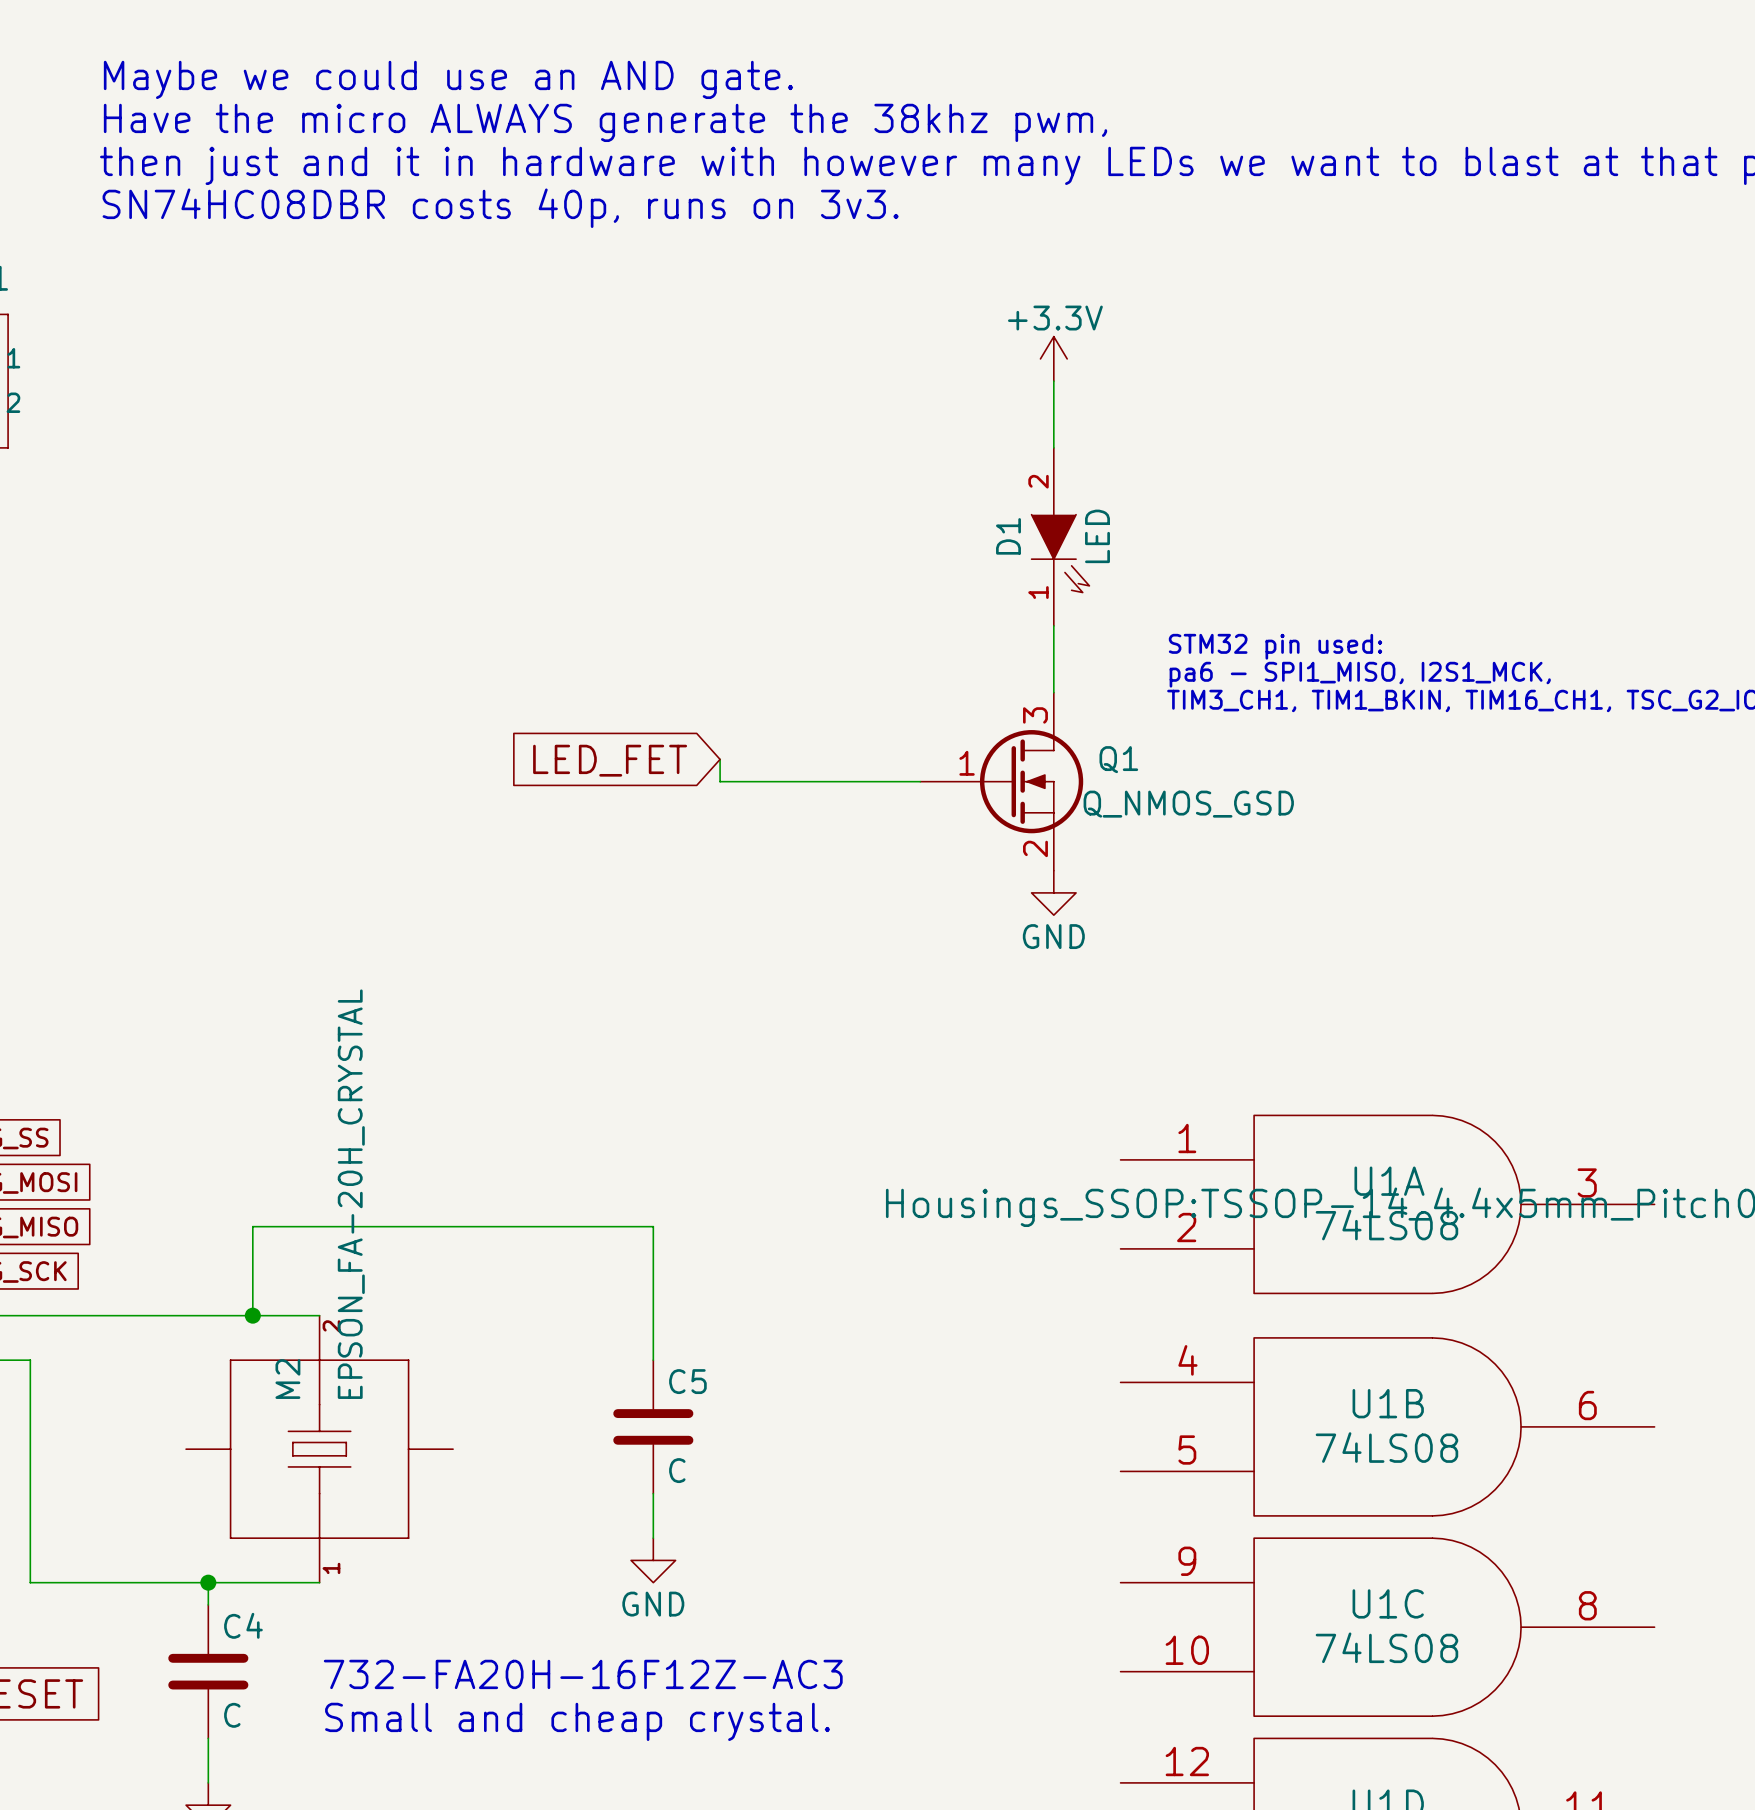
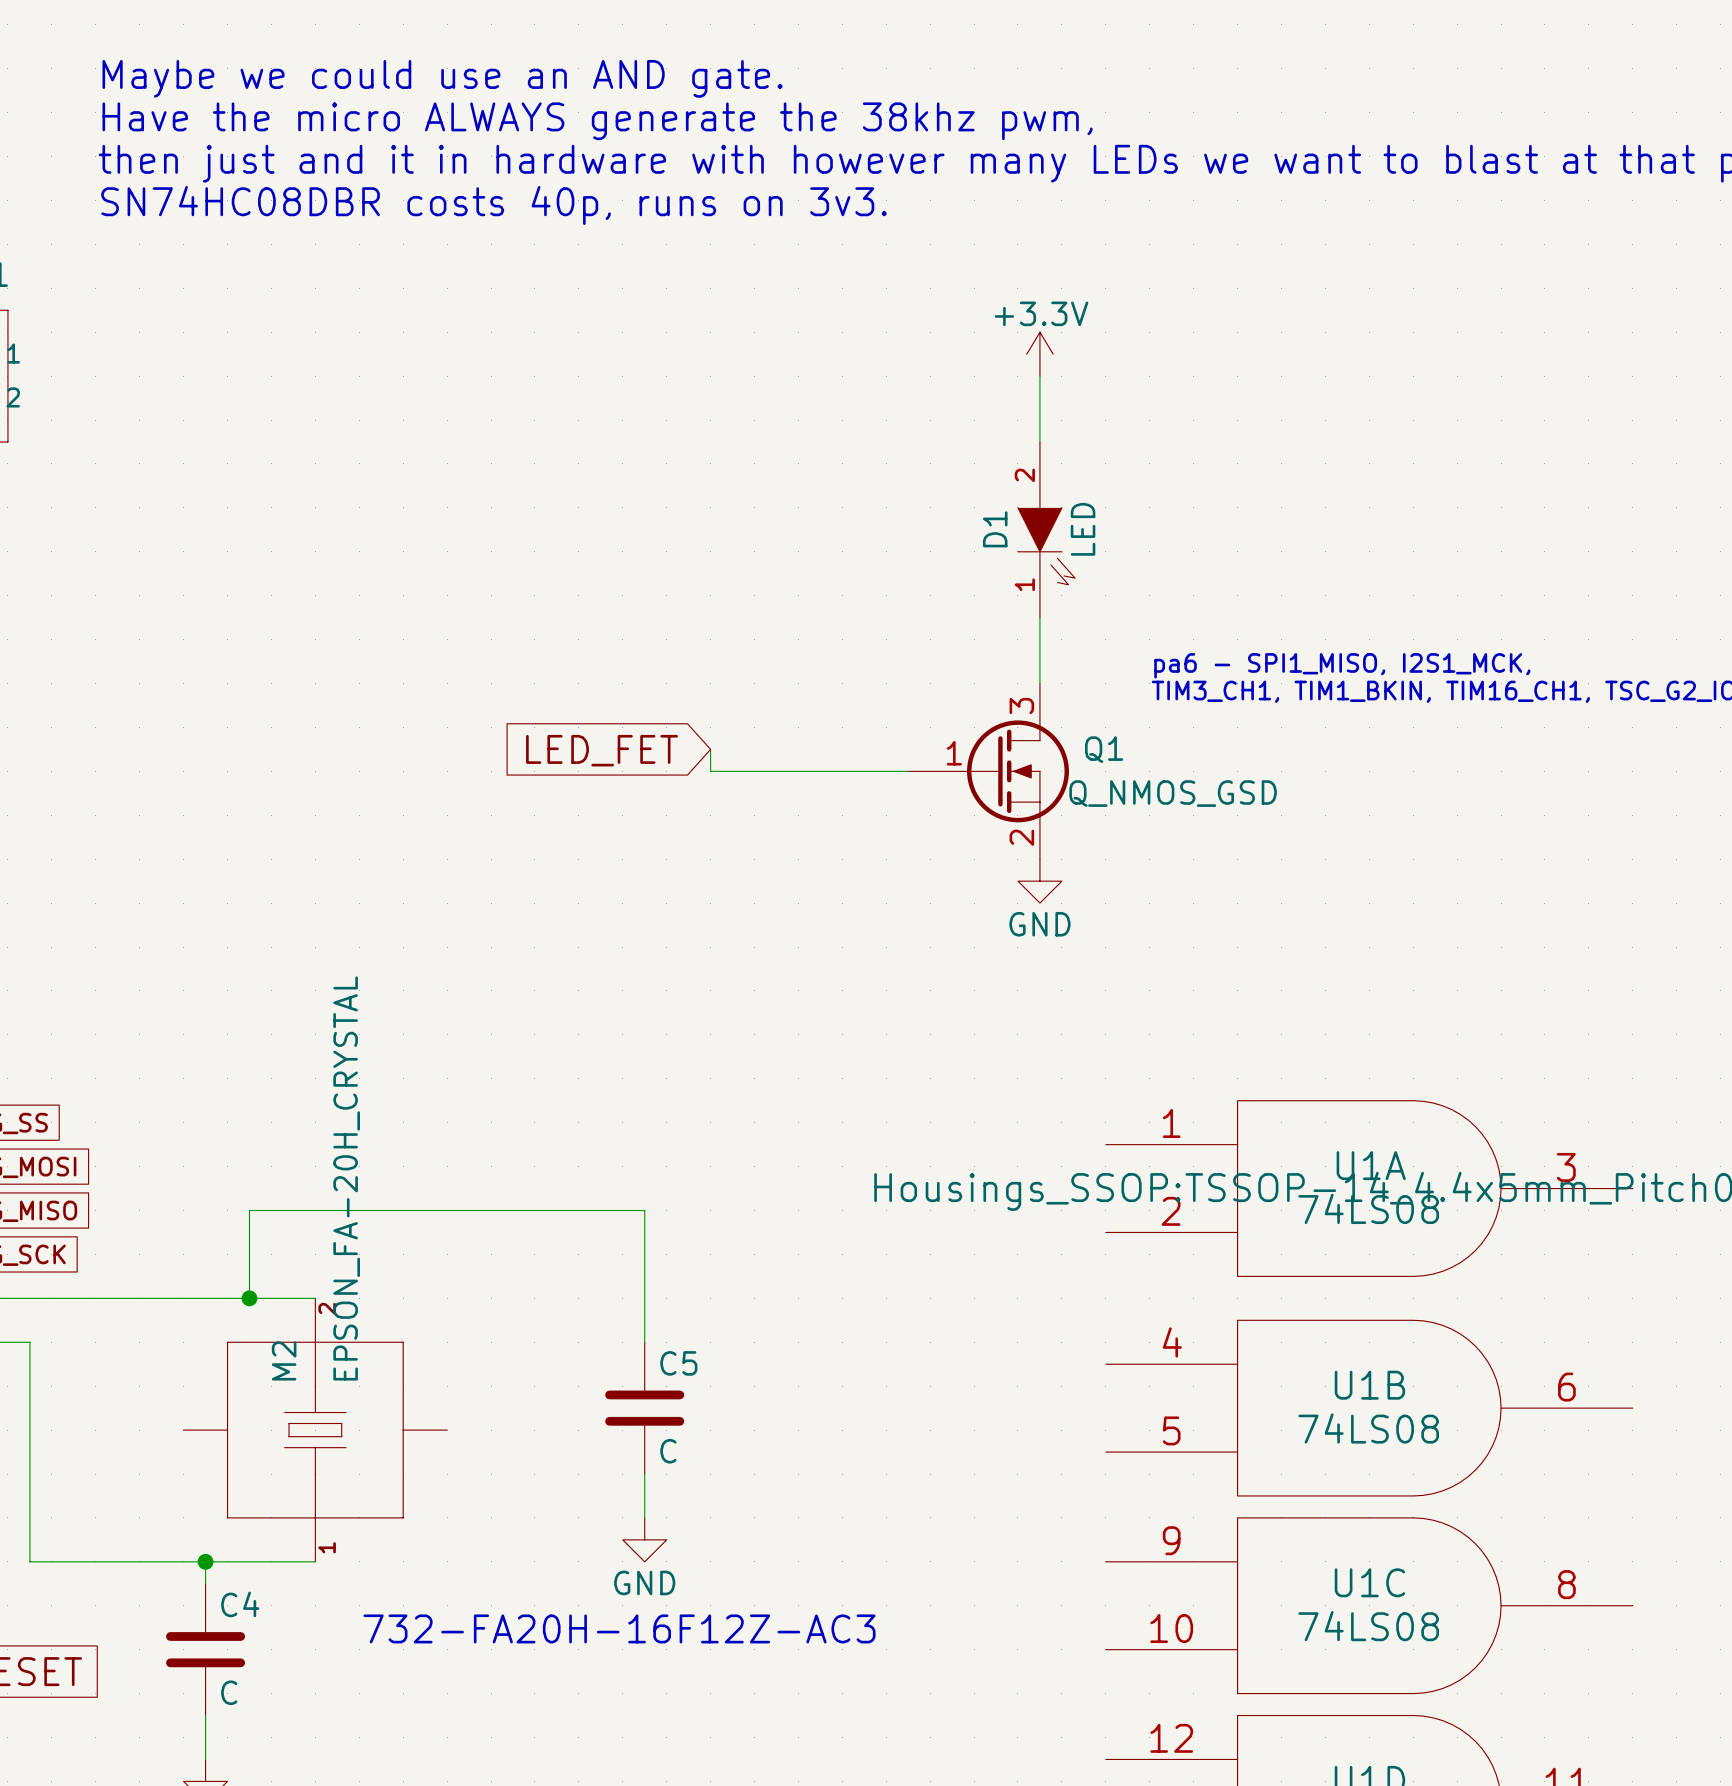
text: STM32 pin used: (1275, 646) -> none
text position: 732-FA20H-16F12Z-AC3 (583, 1674) -> 732-FA20H-16F12Z-AC3 (619, 1628)
text: Small and cheap crystal. (577, 1721) -> none

